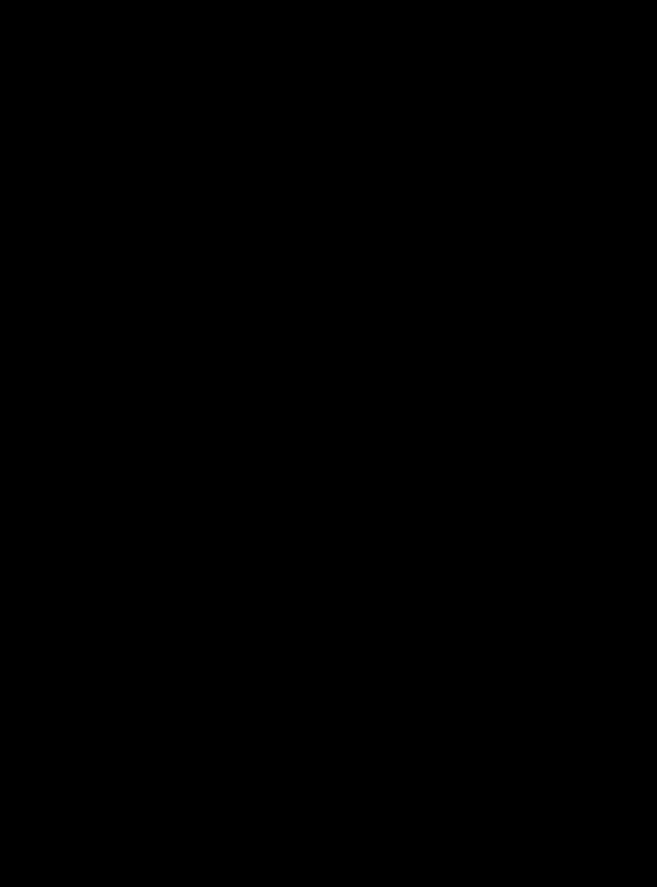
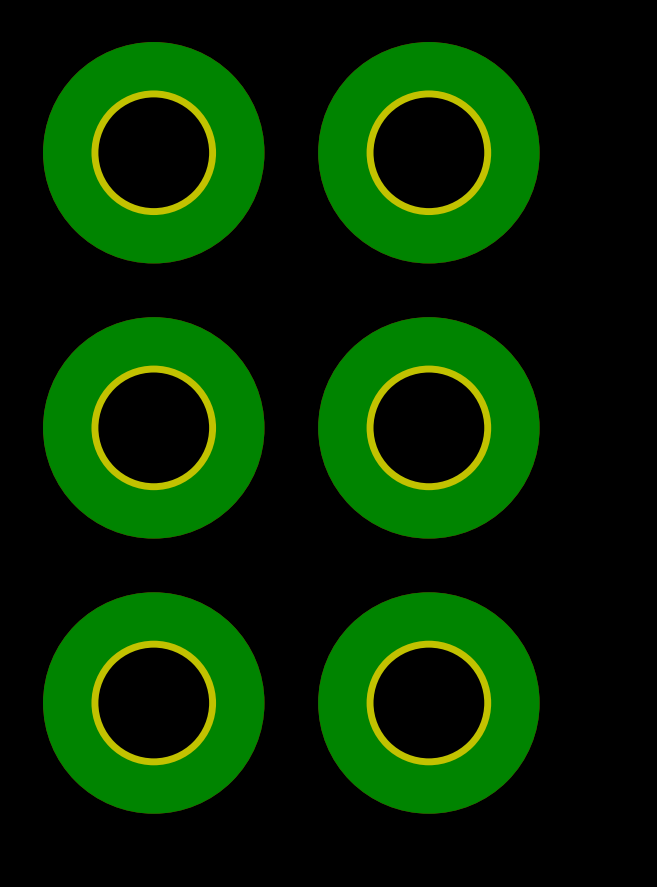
part: none -> (153, 152)
part: none -> (428, 152)
part: none -> (153, 427)
part: none -> (428, 427)
part: none -> (153, 703)
part: none -> (428, 703)

